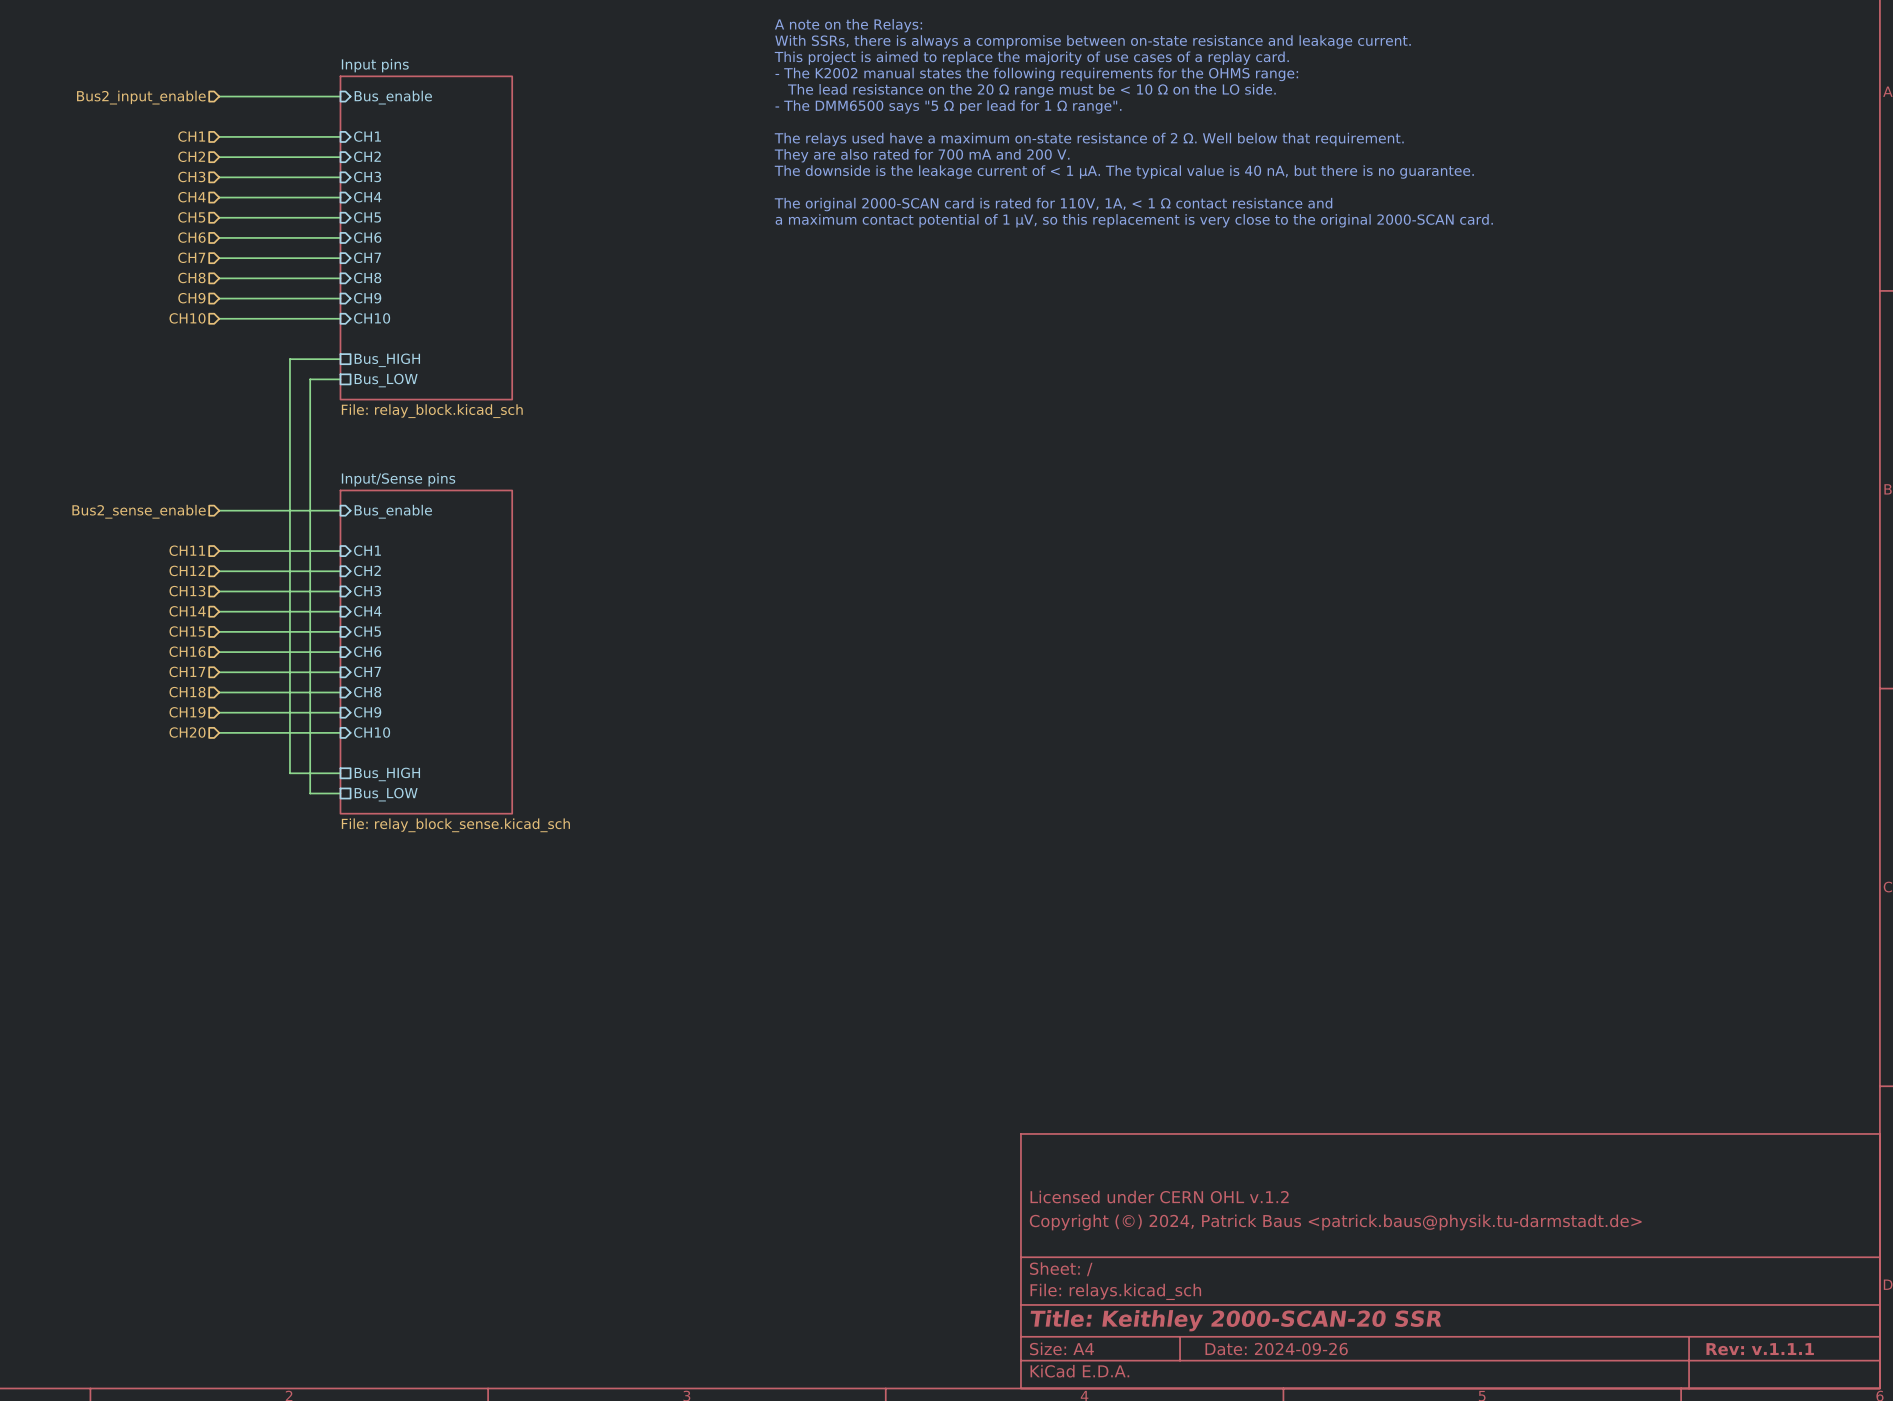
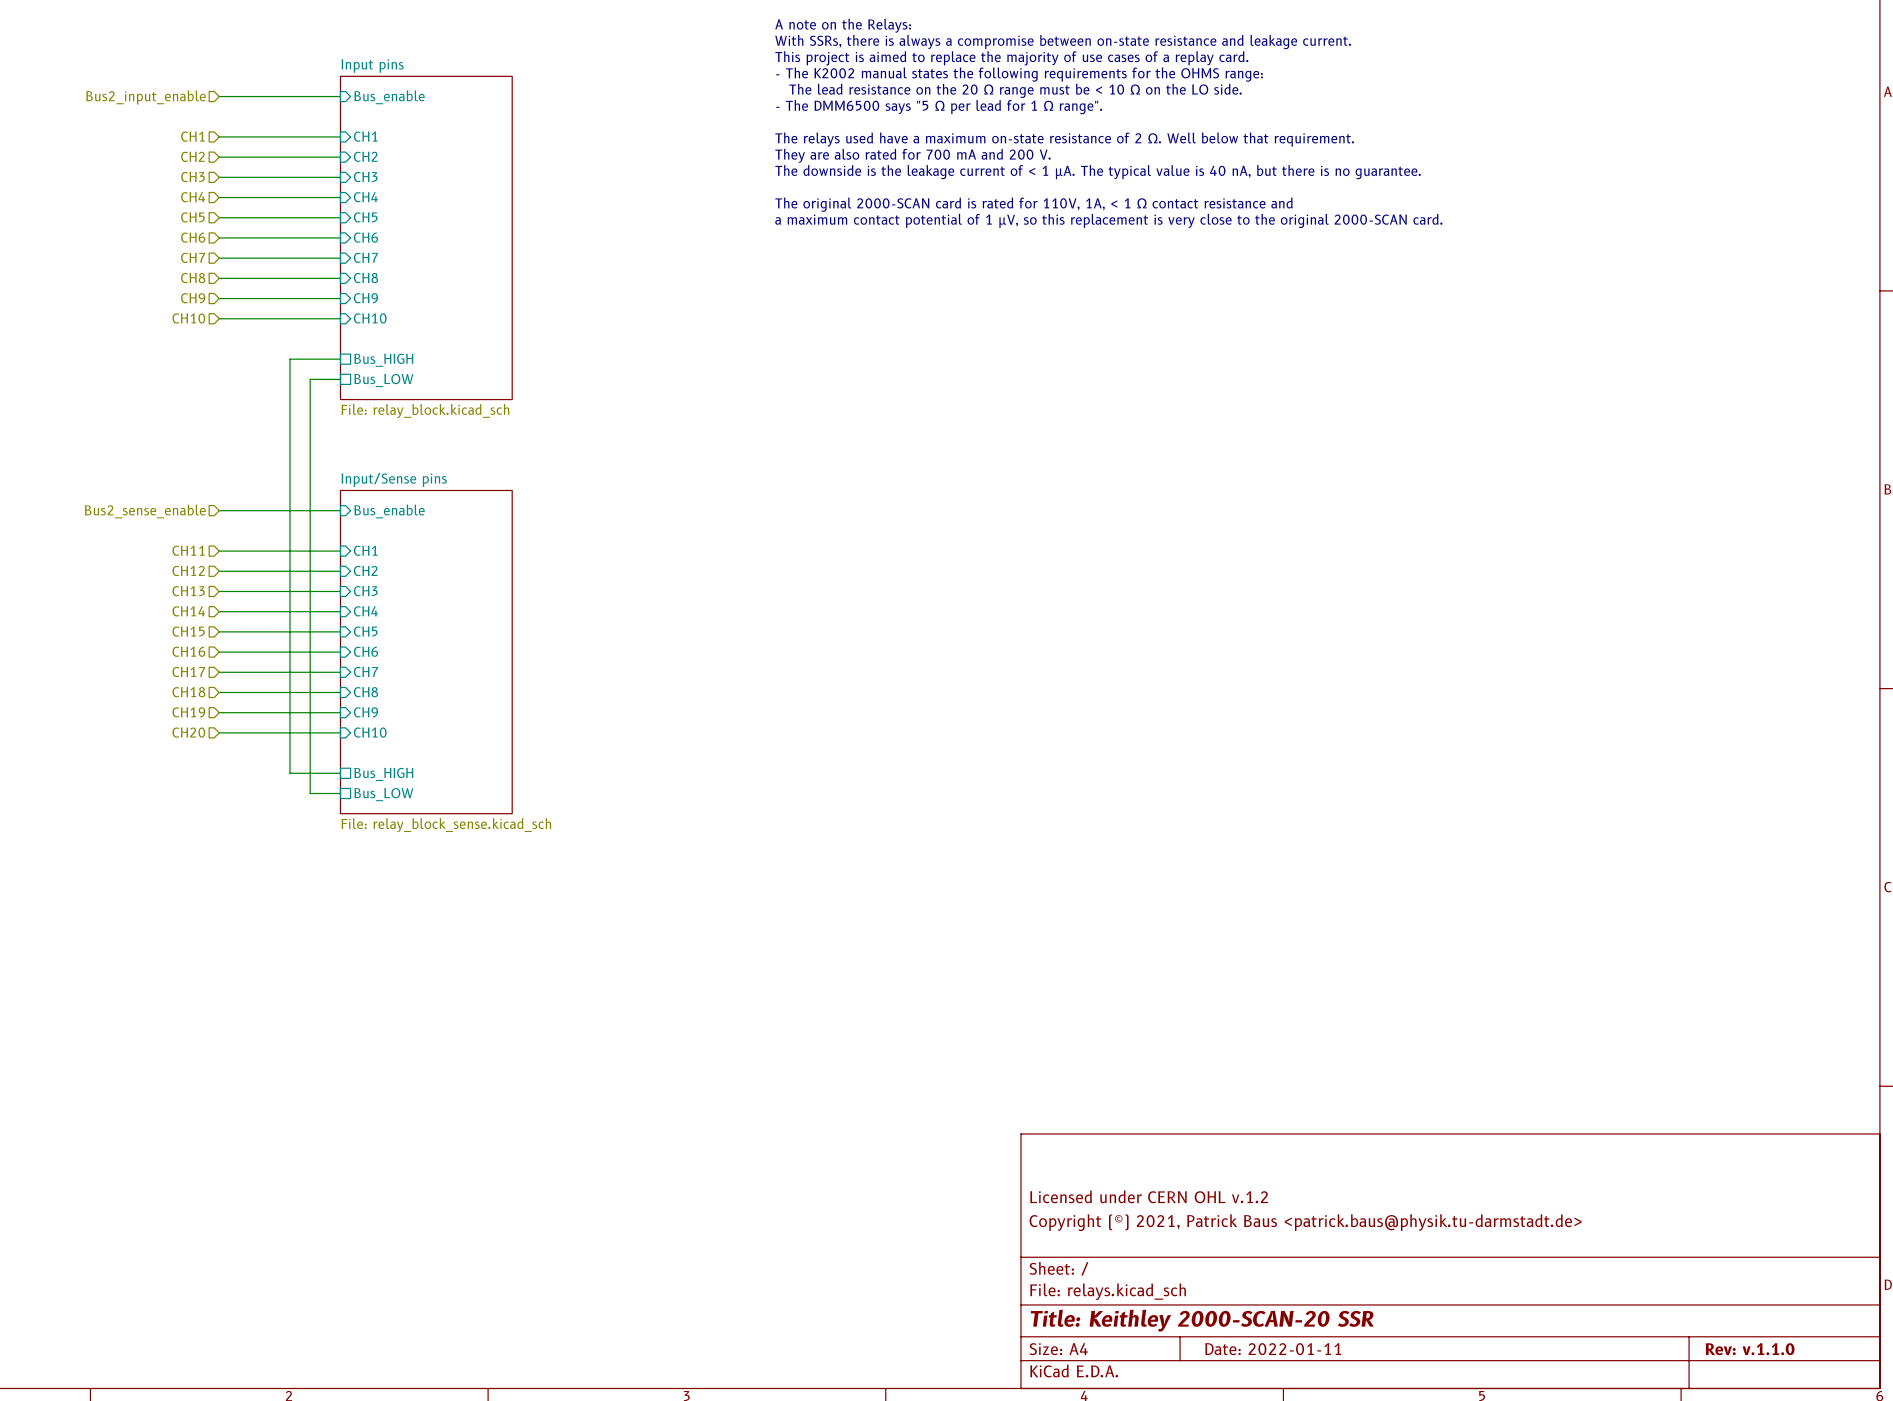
title block: Copyright (©) 2024, Patrick Baus <patrick.baus@physik.tu-darmstadt.de> (1335, 1222) -> Copyright (©) 2021, Patrick Baus <patrick.baus@physik.tu-darmstadt.de> (1305, 1222)
title block: Date: 2024-09-26 (1276, 1349) -> Date: 2022-01-11 (1273, 1349)
title block: Rev: v.1.1.1 (1760, 1349) -> Rev: v.1.1.0 (1750, 1349)

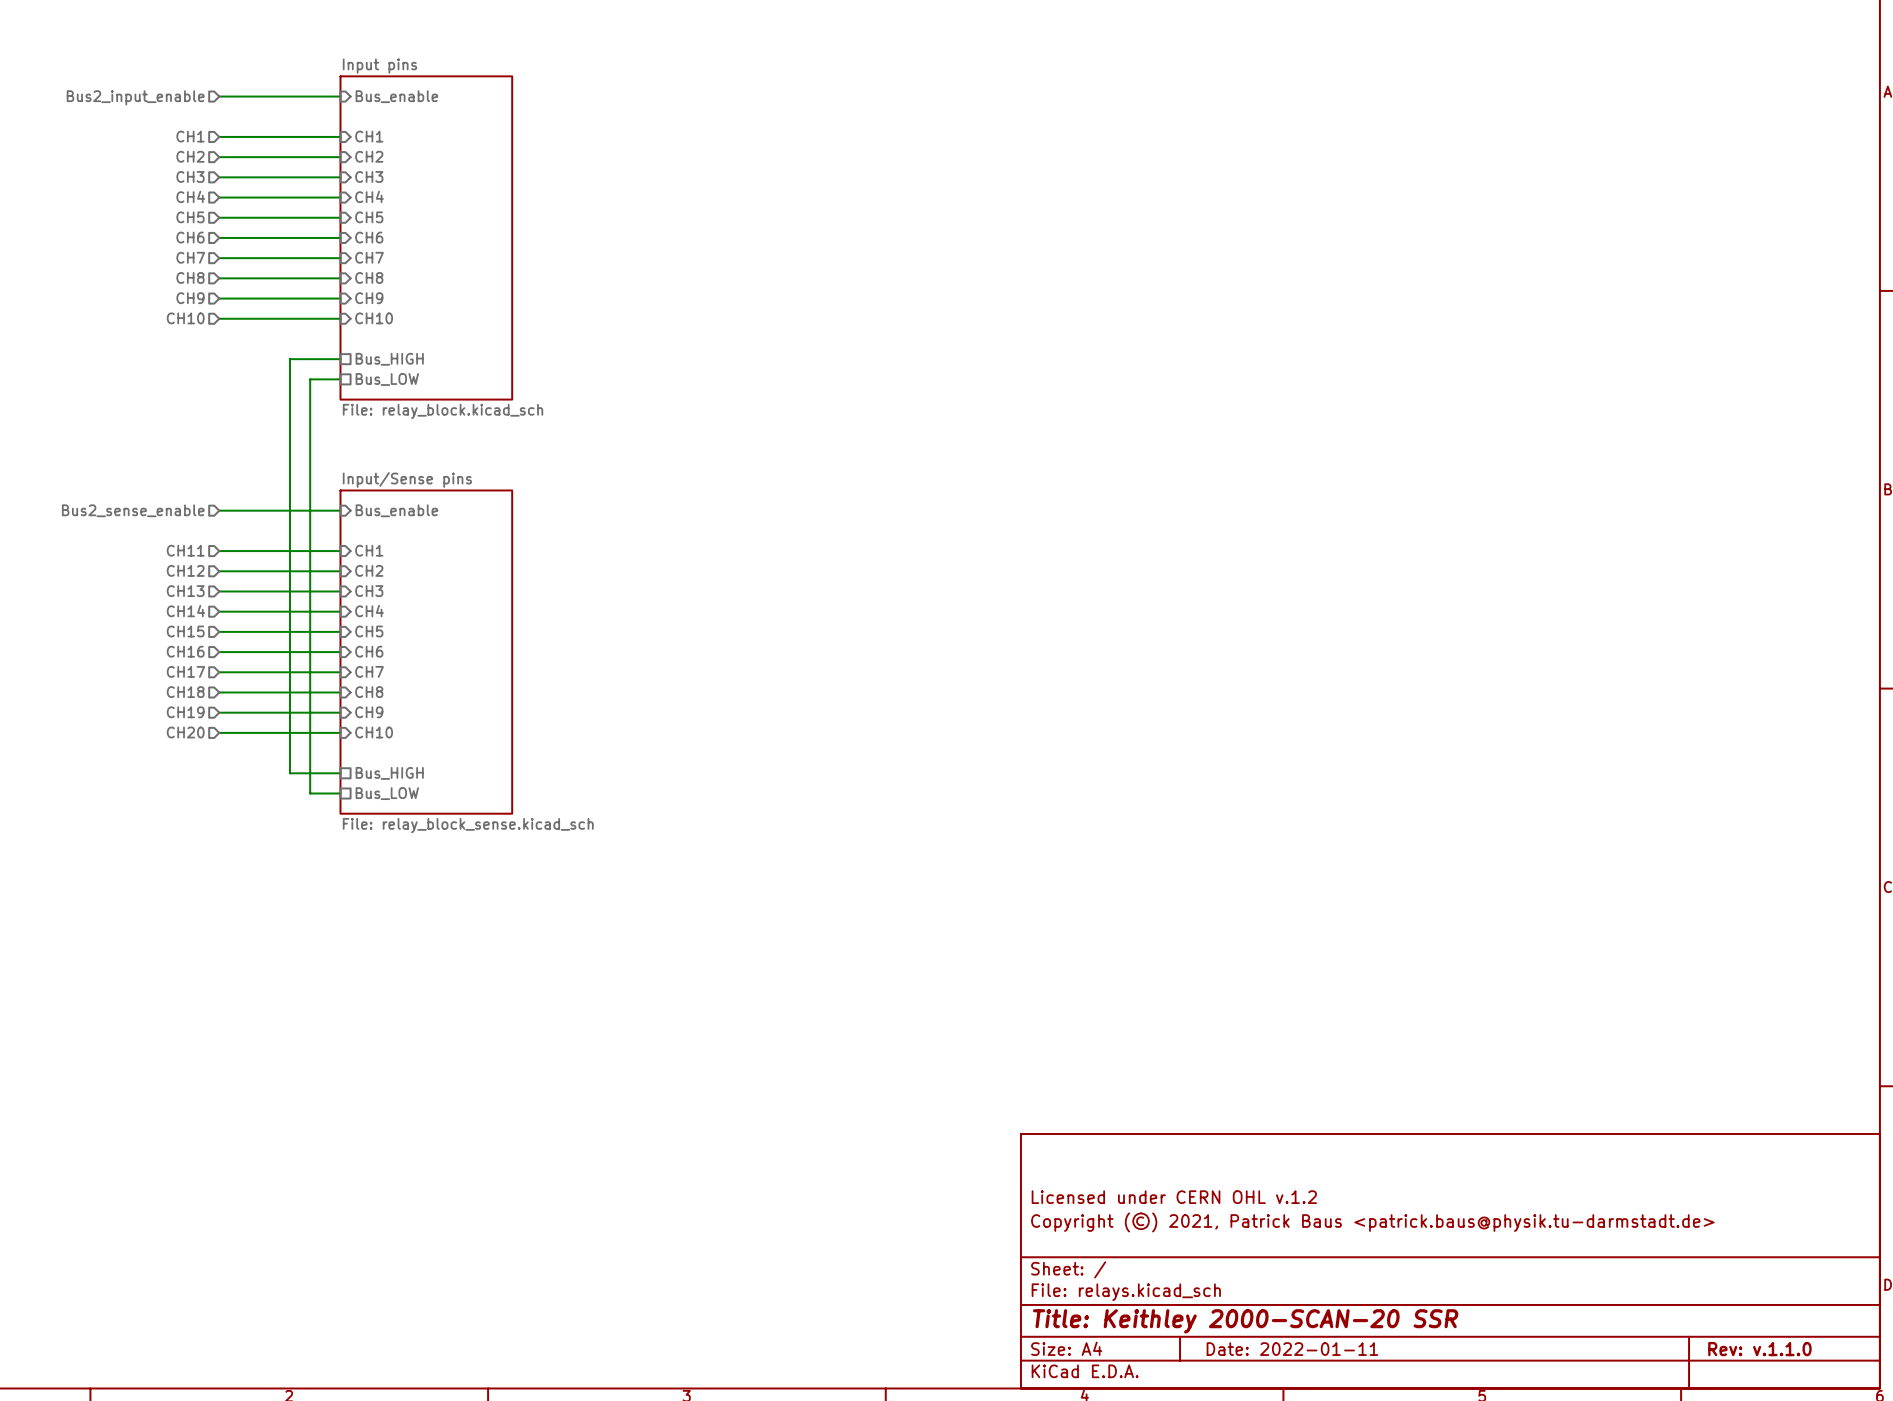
text: A note on the Relays: (843, 25) -> none
text: With SSRs, there is always a compromise between on-state resistance and leakage current. (1063, 42) -> none
text: This project is aimed to replace the majority of use cases of a replay card. (1011, 58) -> none
text: - The K2002 manual states the following requirements for the OHMS range: (1019, 74) -> none
text: The lead resistance on the 20 Ω range must be < 10 Ω on the LO side. (1015, 90) -> none
text: - The DMM6500 says "5 Ω per lead for 1 Ω range". (939, 107) -> none
text: The relays used have a maximum on-state resistance of 2 Ω. Well below that requirement. (1064, 139) -> none
text: They are also rated for 700 mA and 200 V. (913, 155) -> none
text: The downside is the leakage current of < 1 µA. The typical value is 40 nA, but there is no guarantee. (1098, 172) -> none
text: The original 2000-SCAN card is rated for 110V, 1A, < 1 Ω contact resistance and (1033, 204) -> none
text: a maximum contact potential of 1 µV, so this replacement is very close to the original 2000-SCAN card. (1108, 220) -> none

